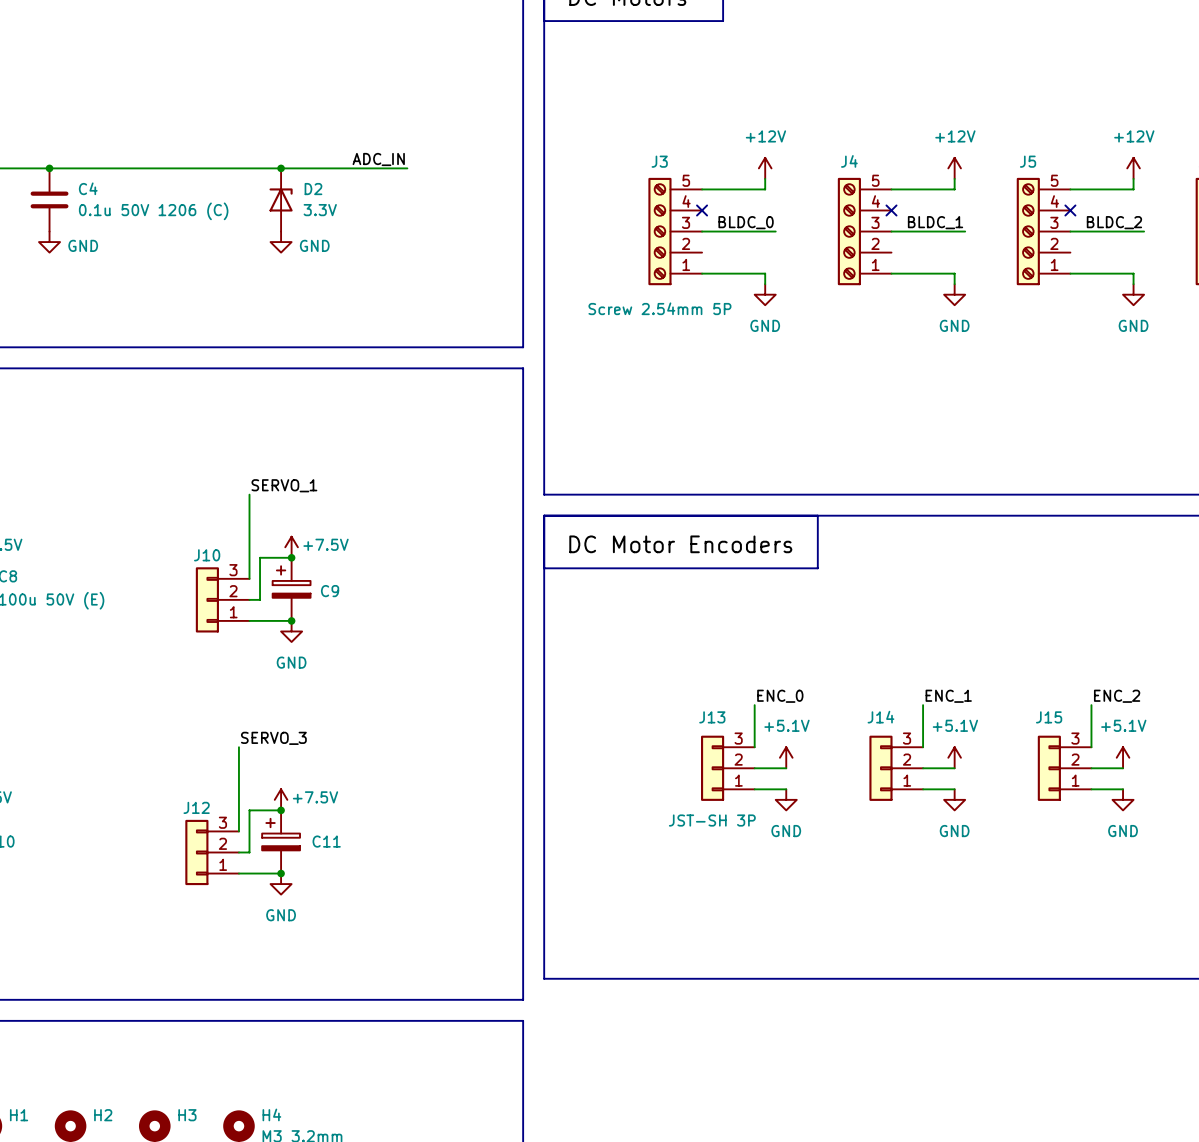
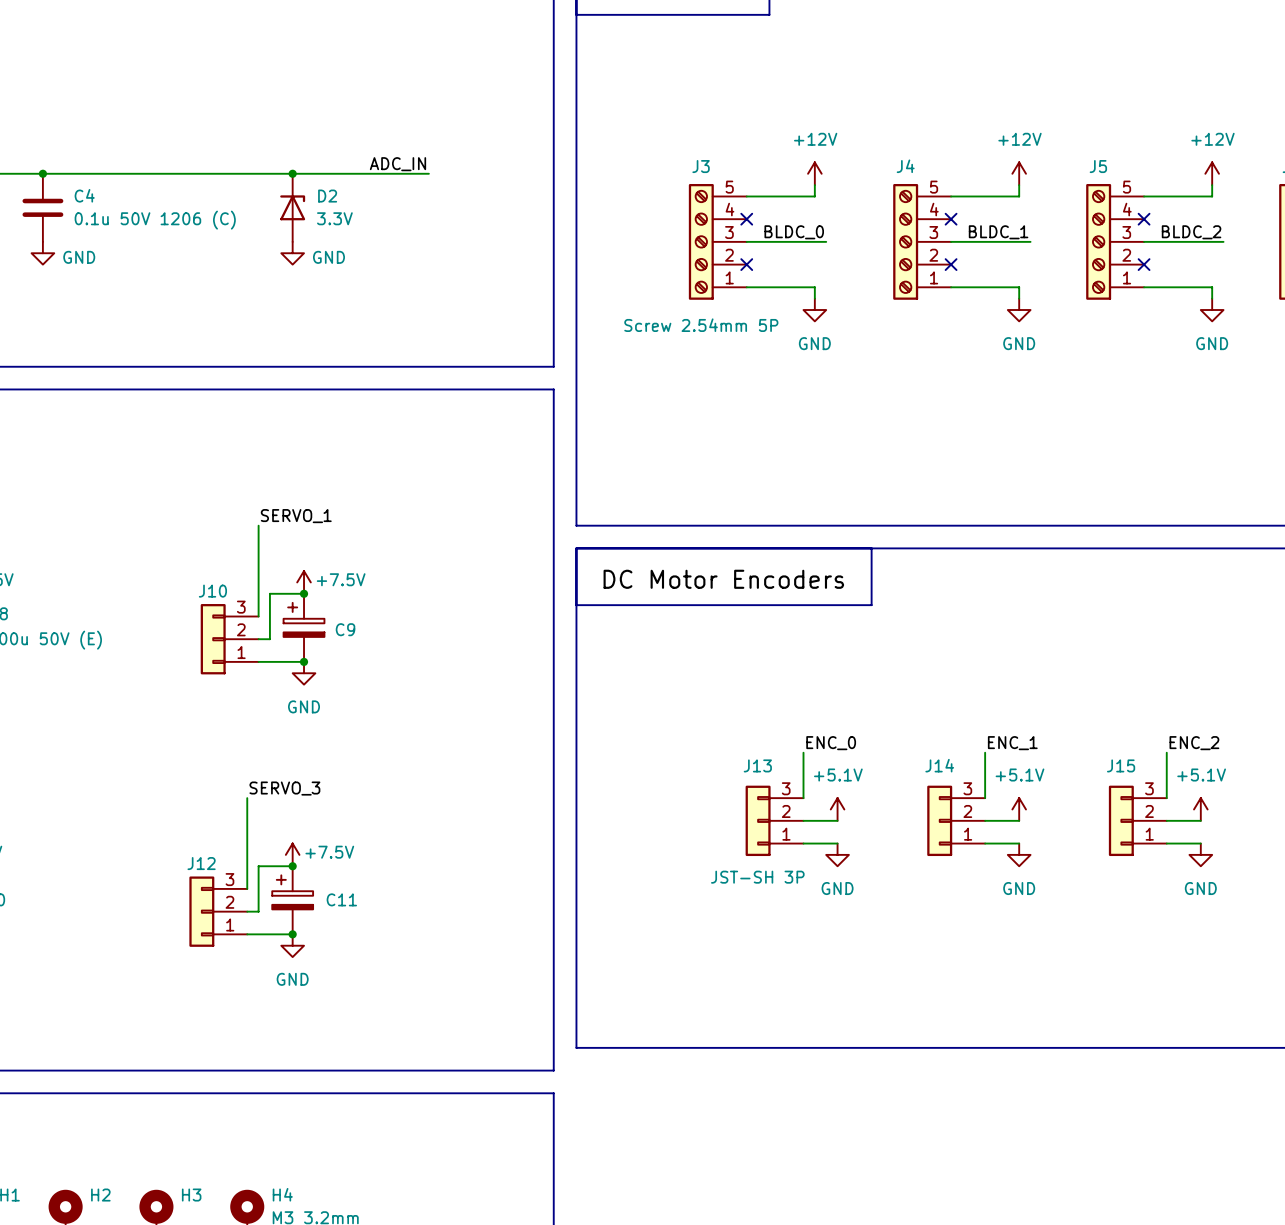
no-connect mark: none -> (746, 264)
no-connect mark: none -> (951, 264)
no-connect mark: none -> (1144, 264)

